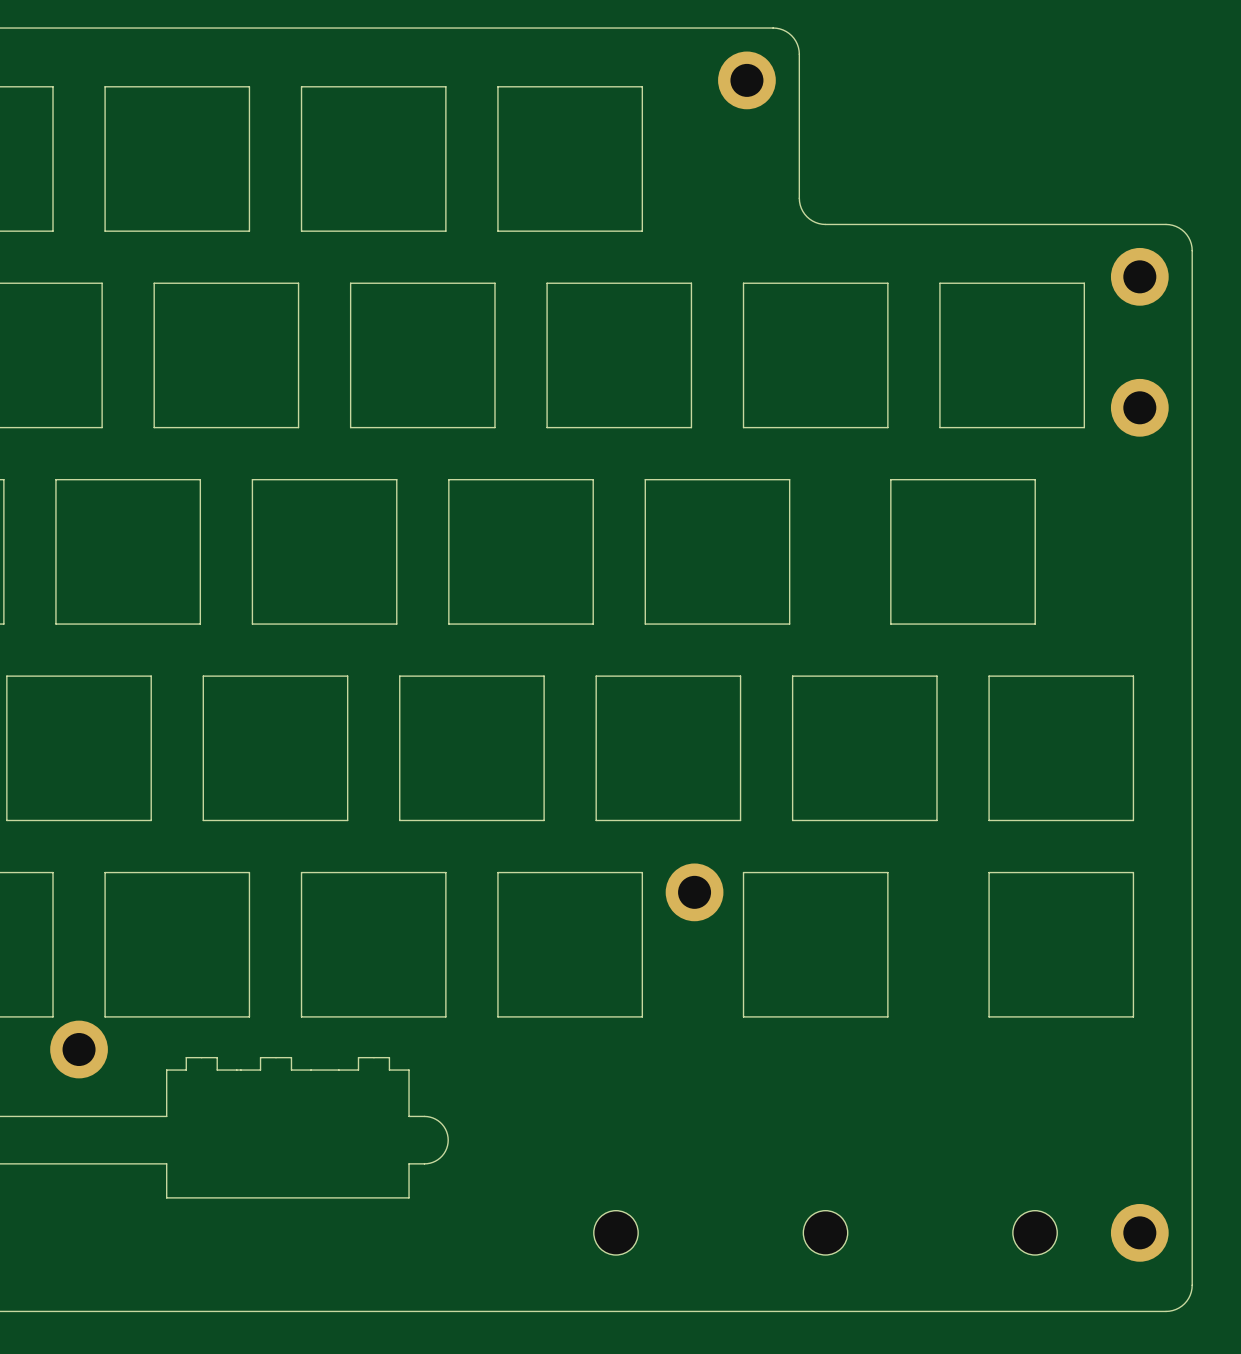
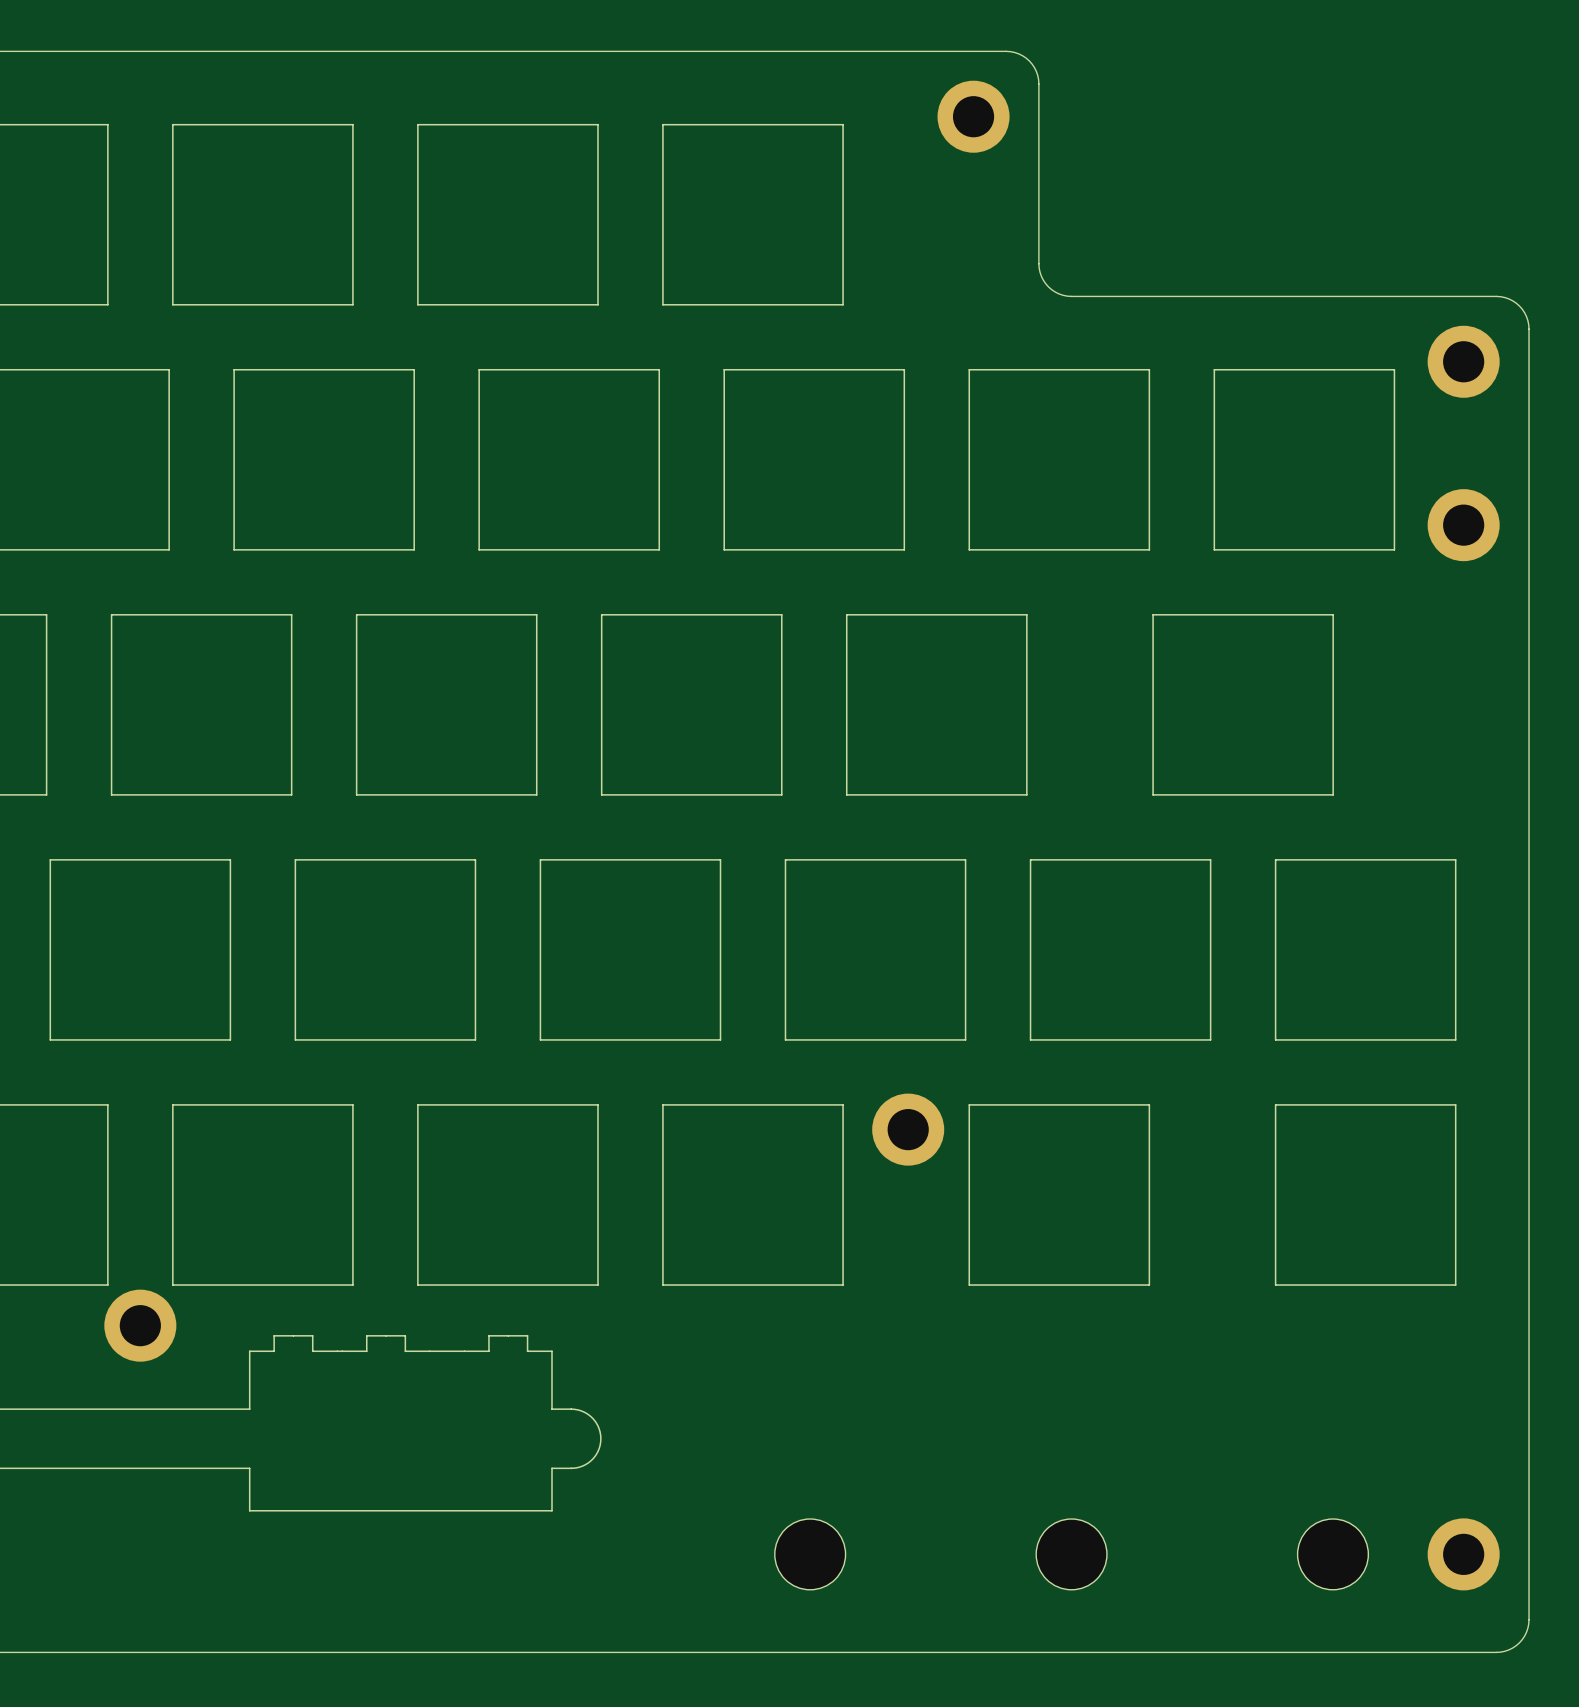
part footprint: [593, 1210, 639, 1256] -> [774, 1519, 846, 1590]
part footprint: [803, 1210, 848, 1256] -> [1036, 1519, 1107, 1590]
part footprint: [1012, 1210, 1058, 1256] -> [1297, 1519, 1369, 1590]

